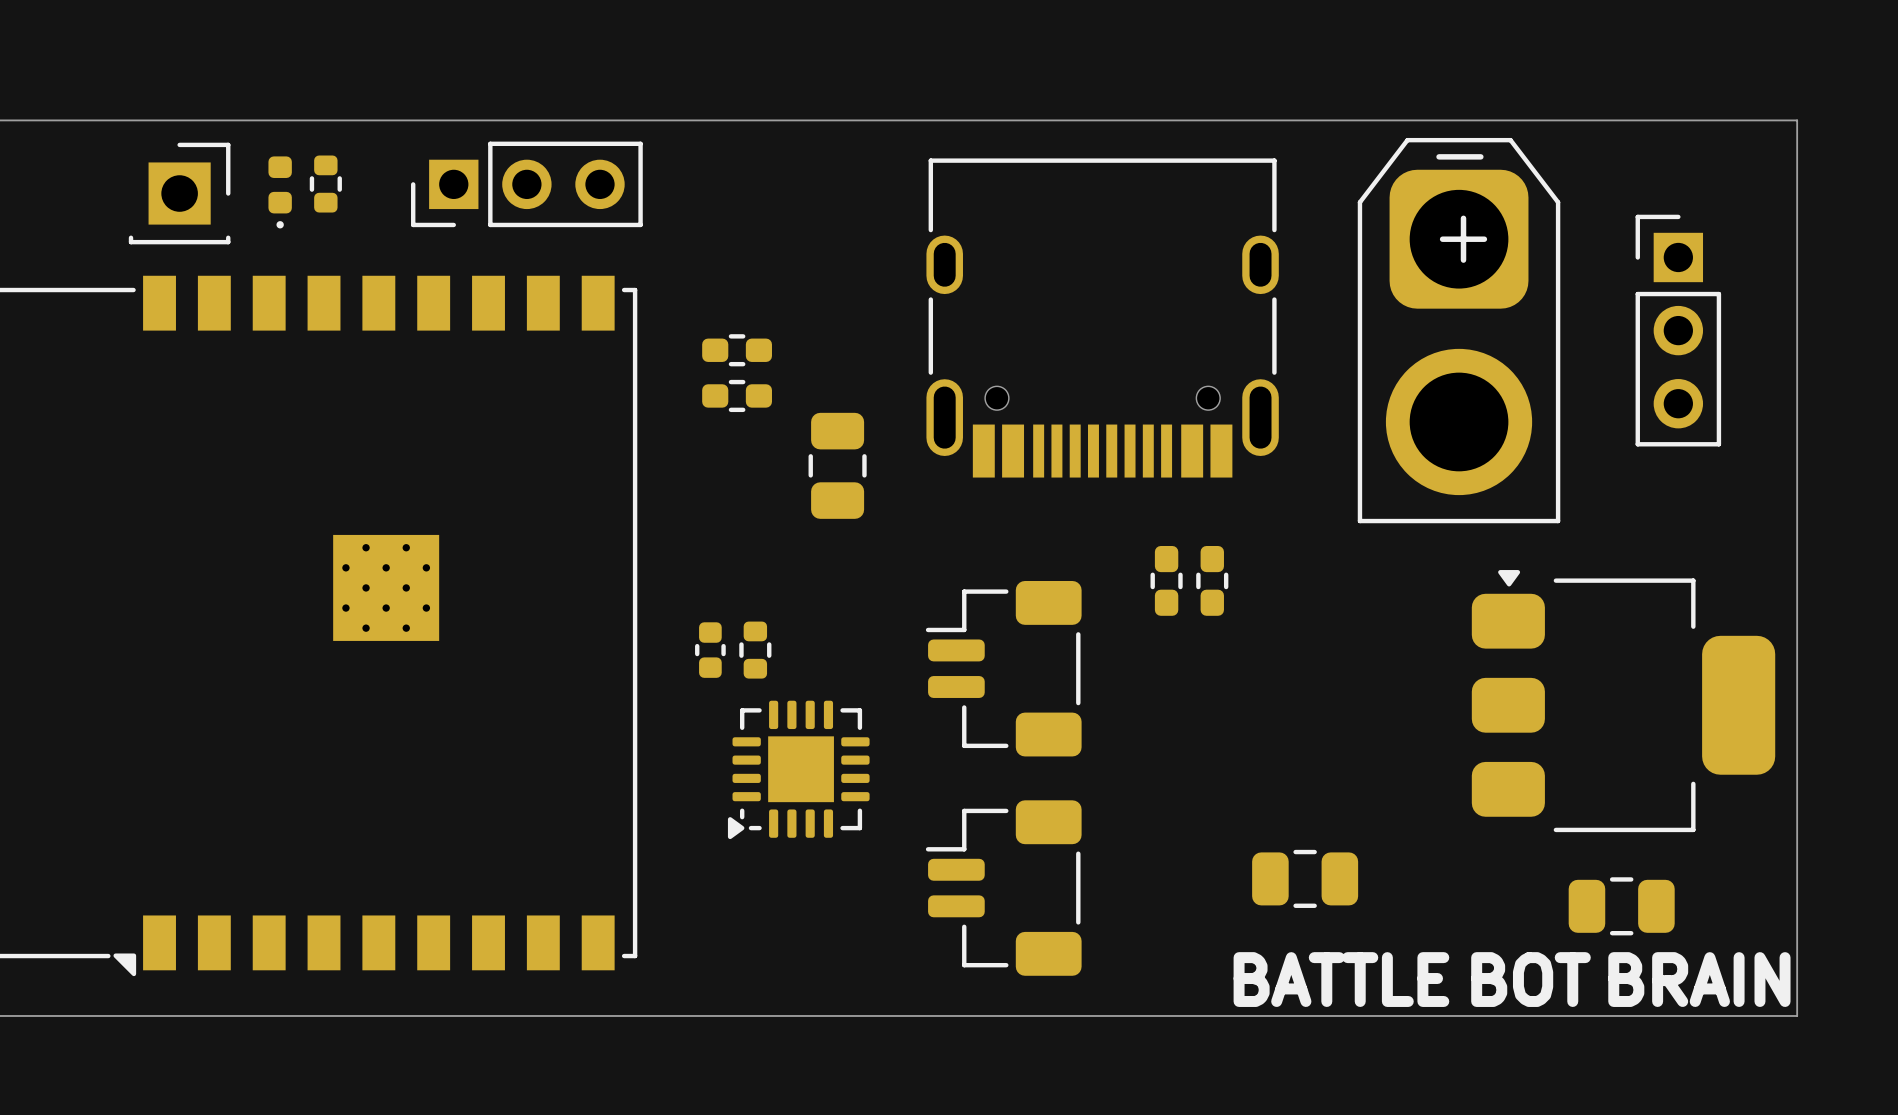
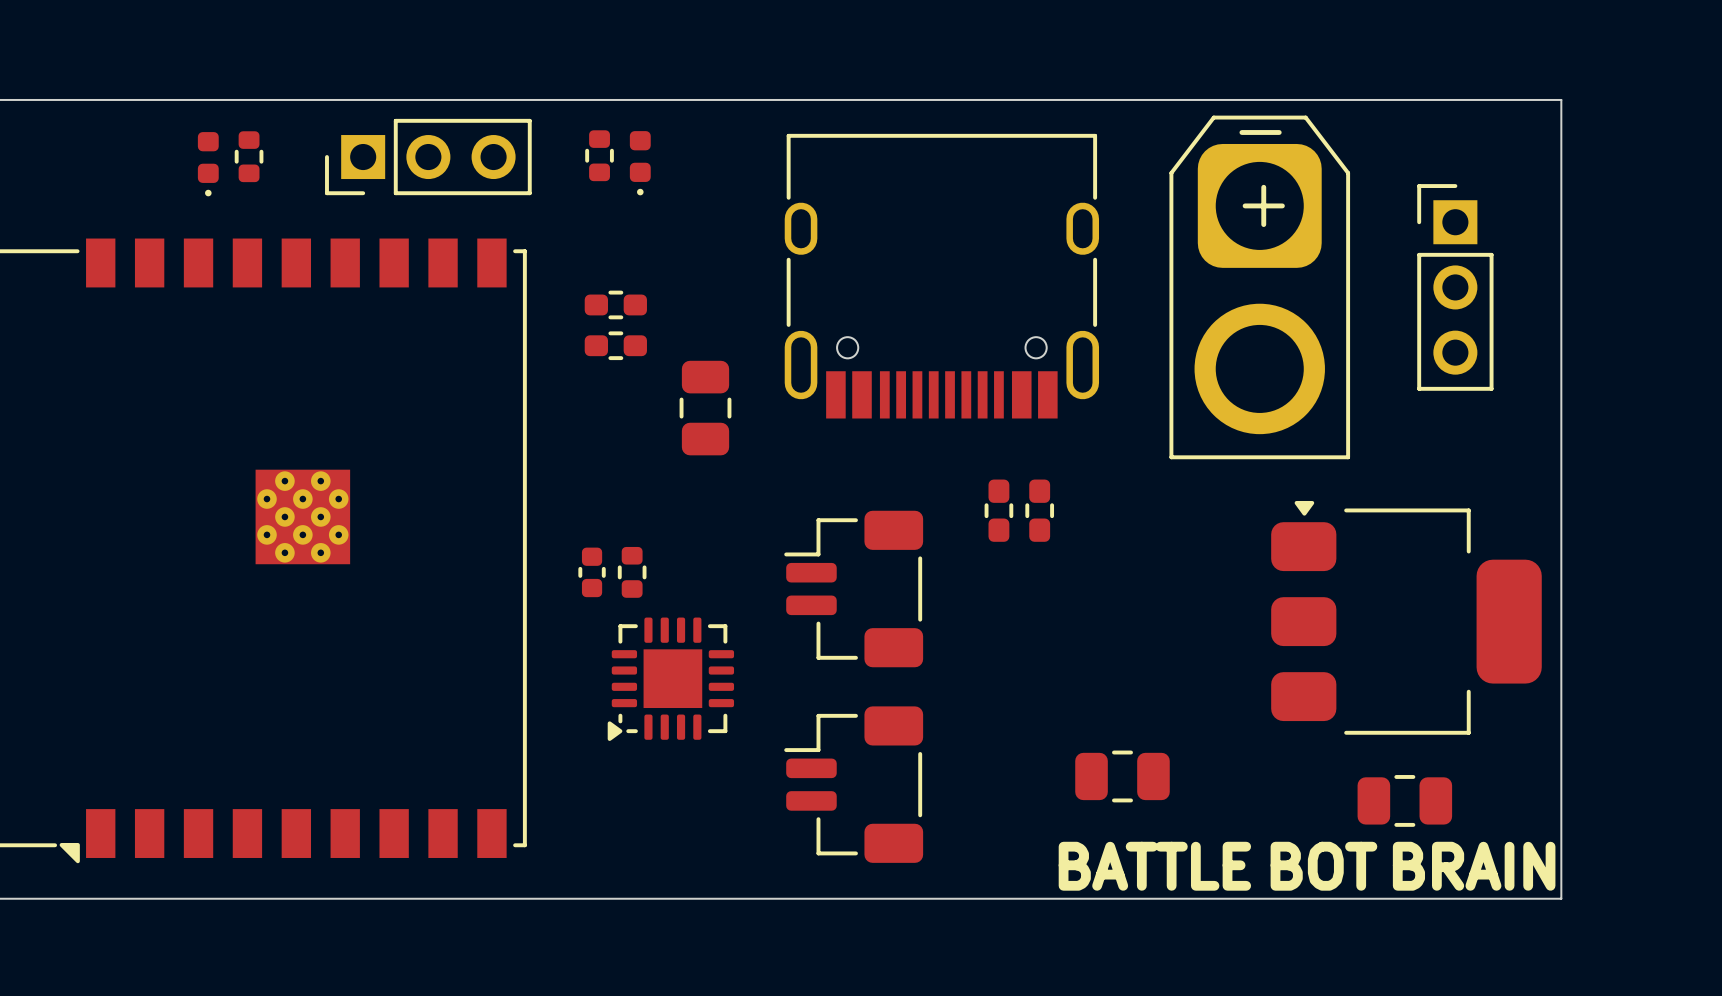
part: none -> (599, 155)
part: none -> (640, 163)
part: (179, 193) -> none

